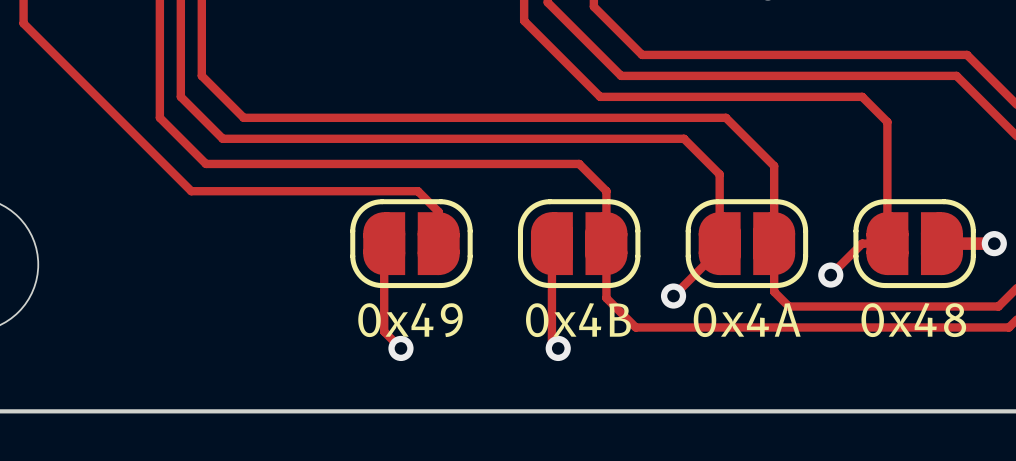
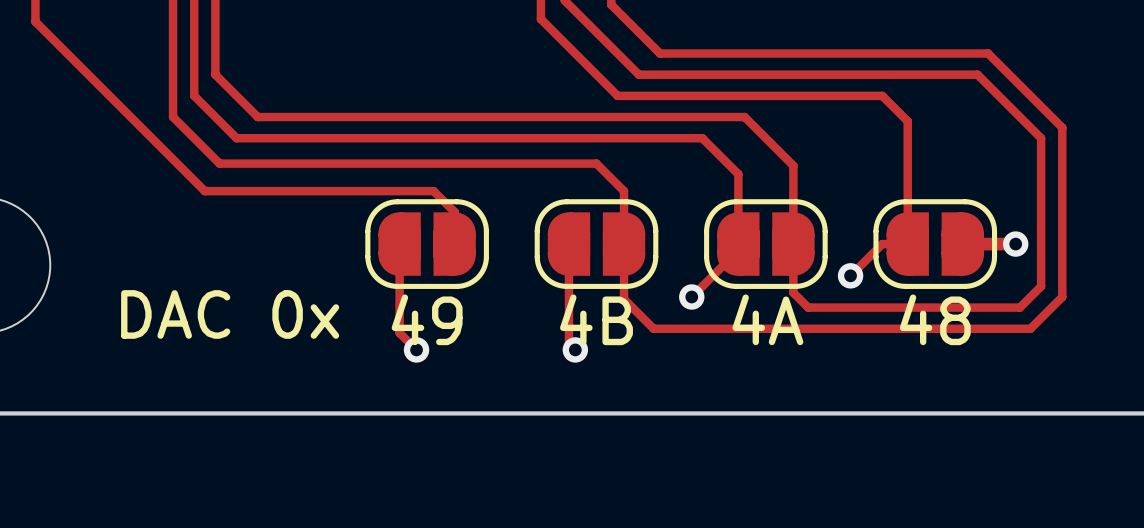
text: none -> DAC 0x (230, 314)
text: 0x49 (410, 320) -> 49 (427, 319)
text: 0x4B (578, 320) -> 4B (596, 319)
text: 0x4A (747, 320) -> 4A (767, 319)
text: 0x48 (913, 320) -> 48 (935, 319)

